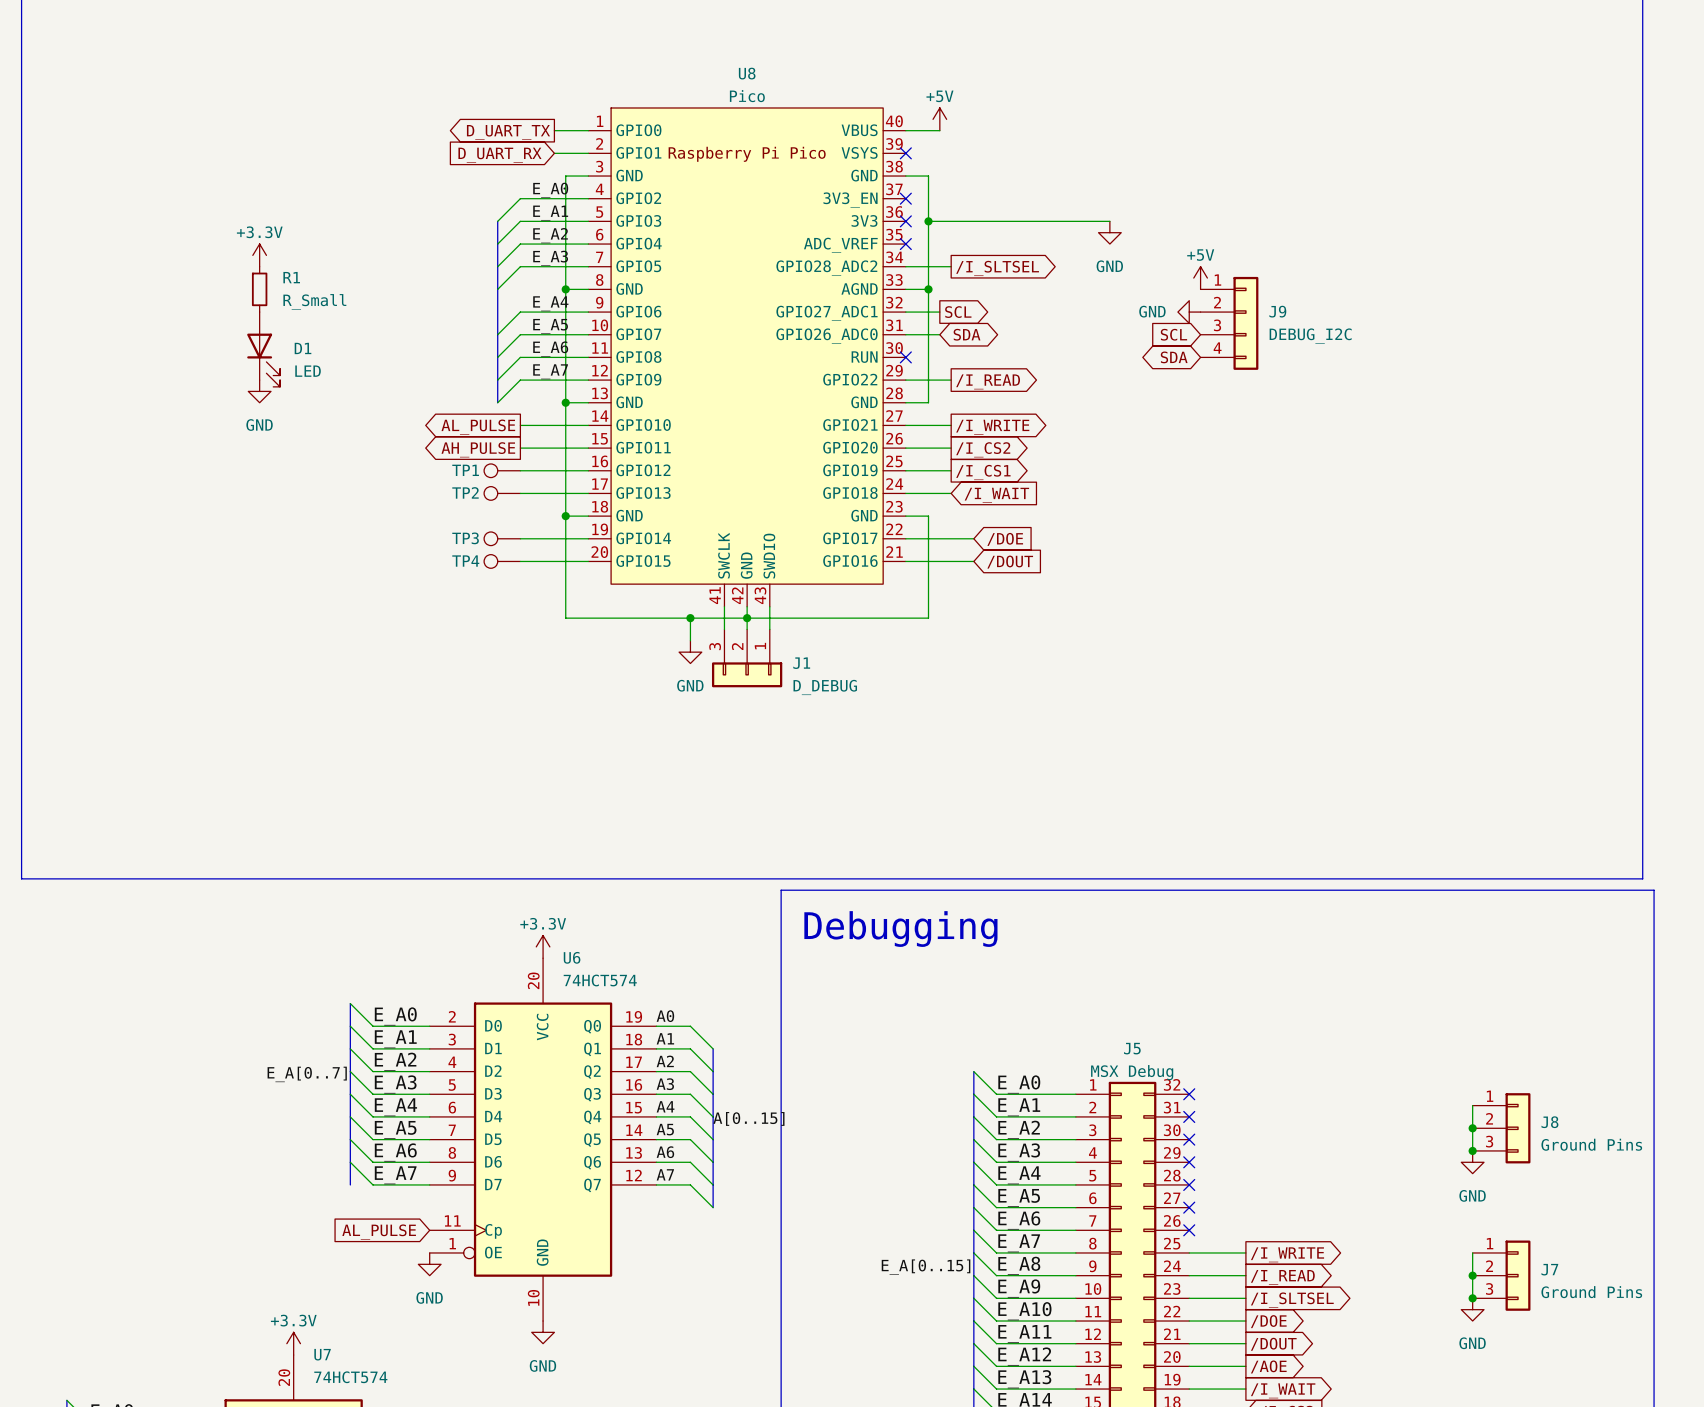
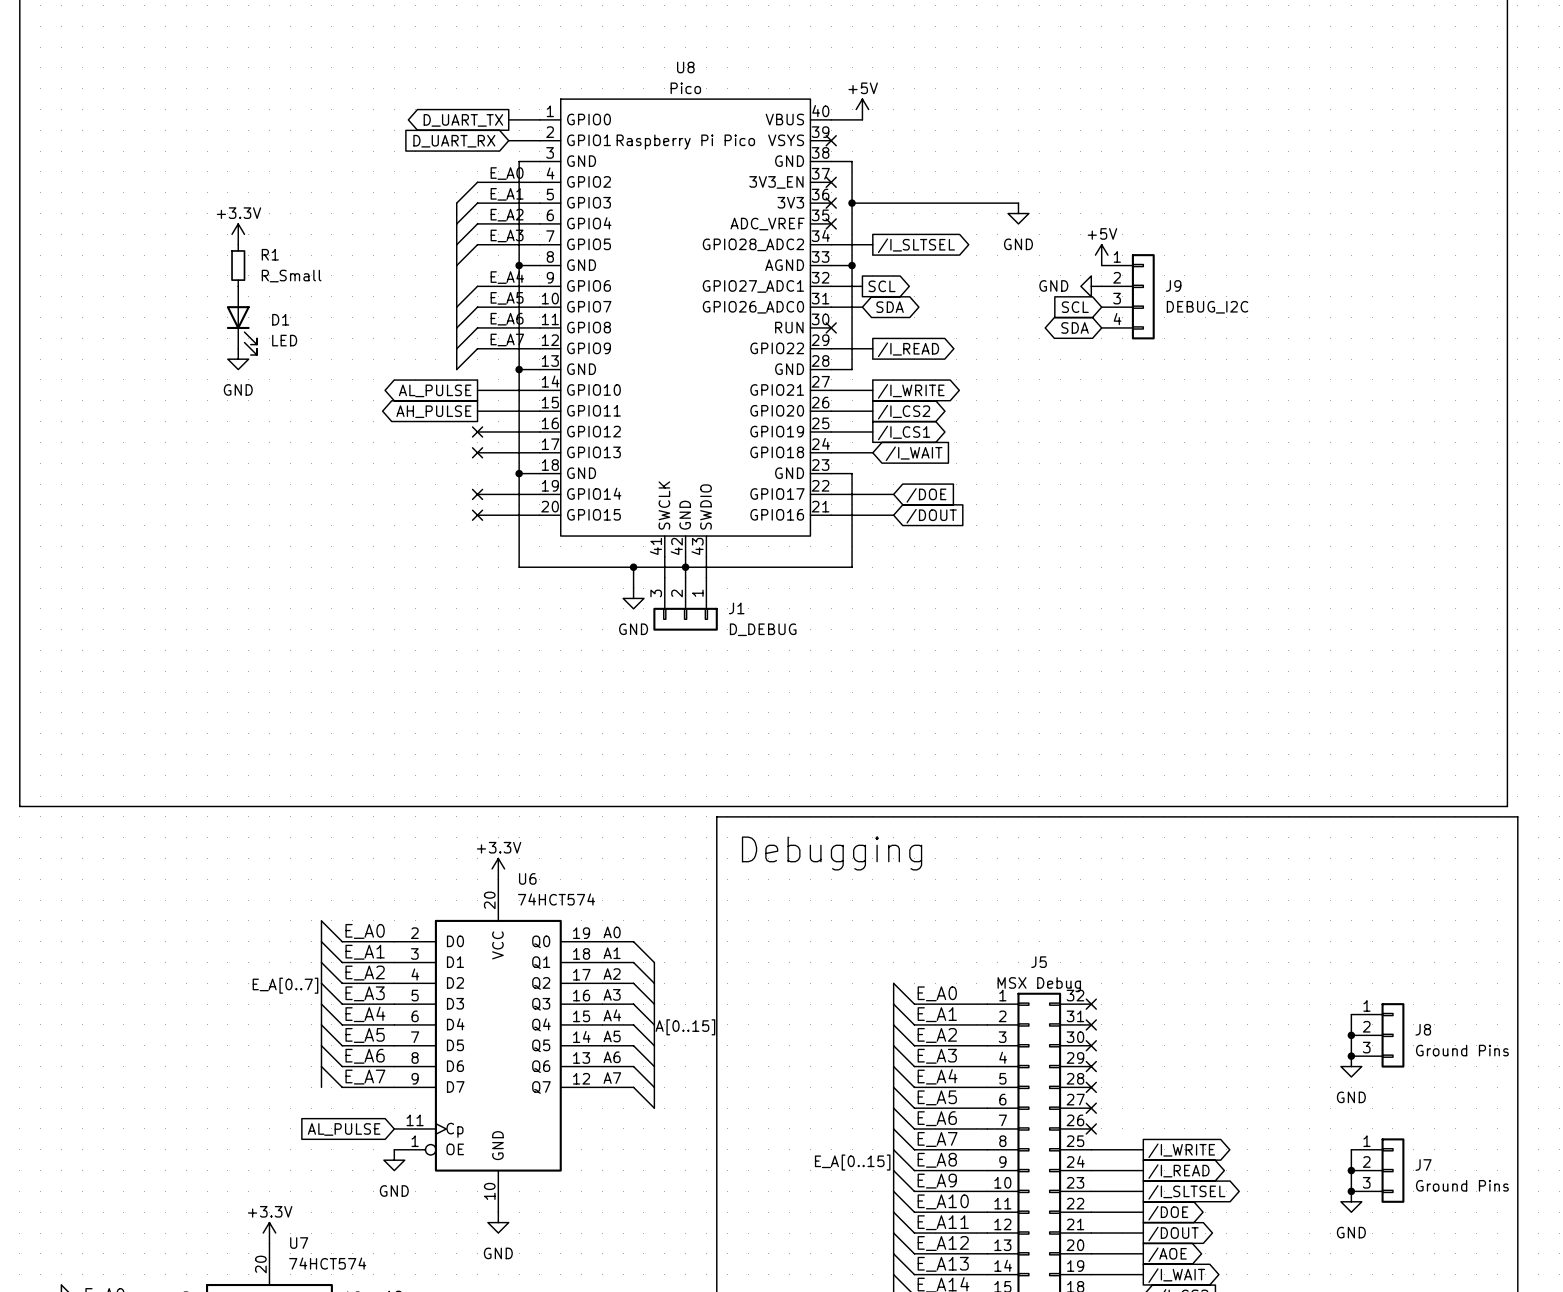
TP1: (502, 470) -> none
no-connect mark: none -> (477, 431)
TP2: (502, 493) -> none
no-connect mark: none -> (477, 452)
TP3: (502, 538) -> none
no-connect mark: none -> (477, 494)
TP4: (502, 561) -> none
no-connect mark: none -> (477, 515)

